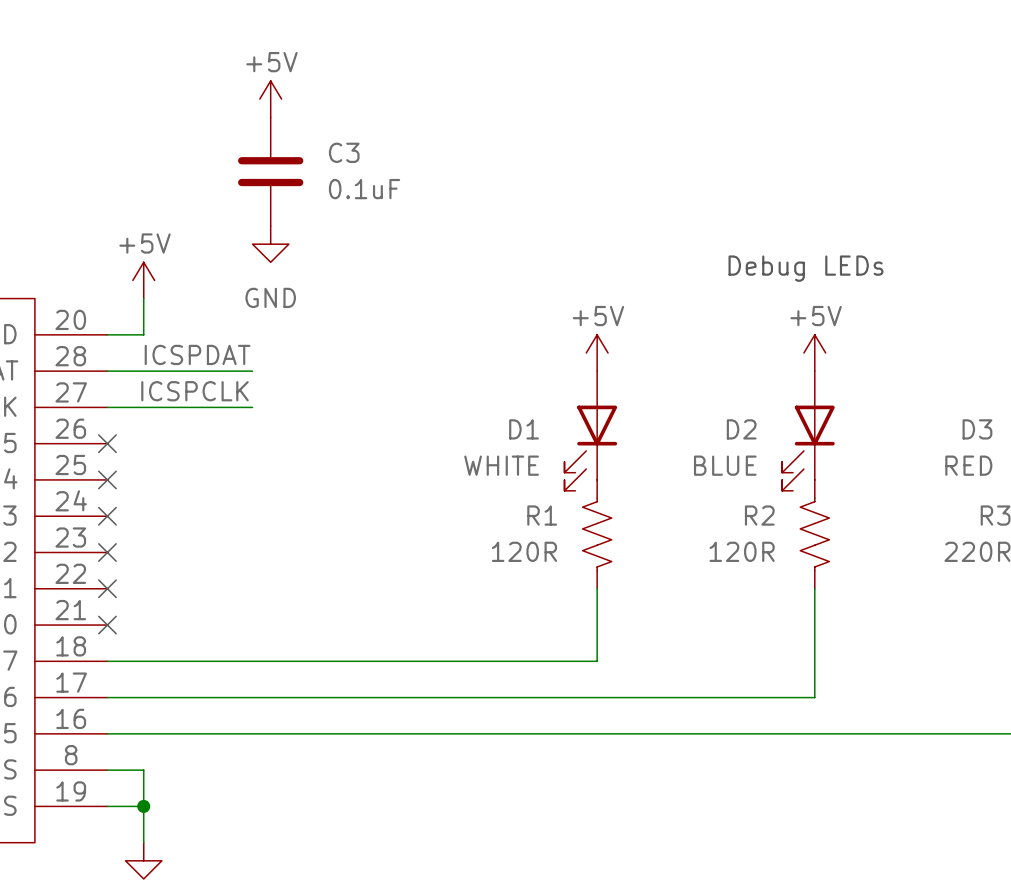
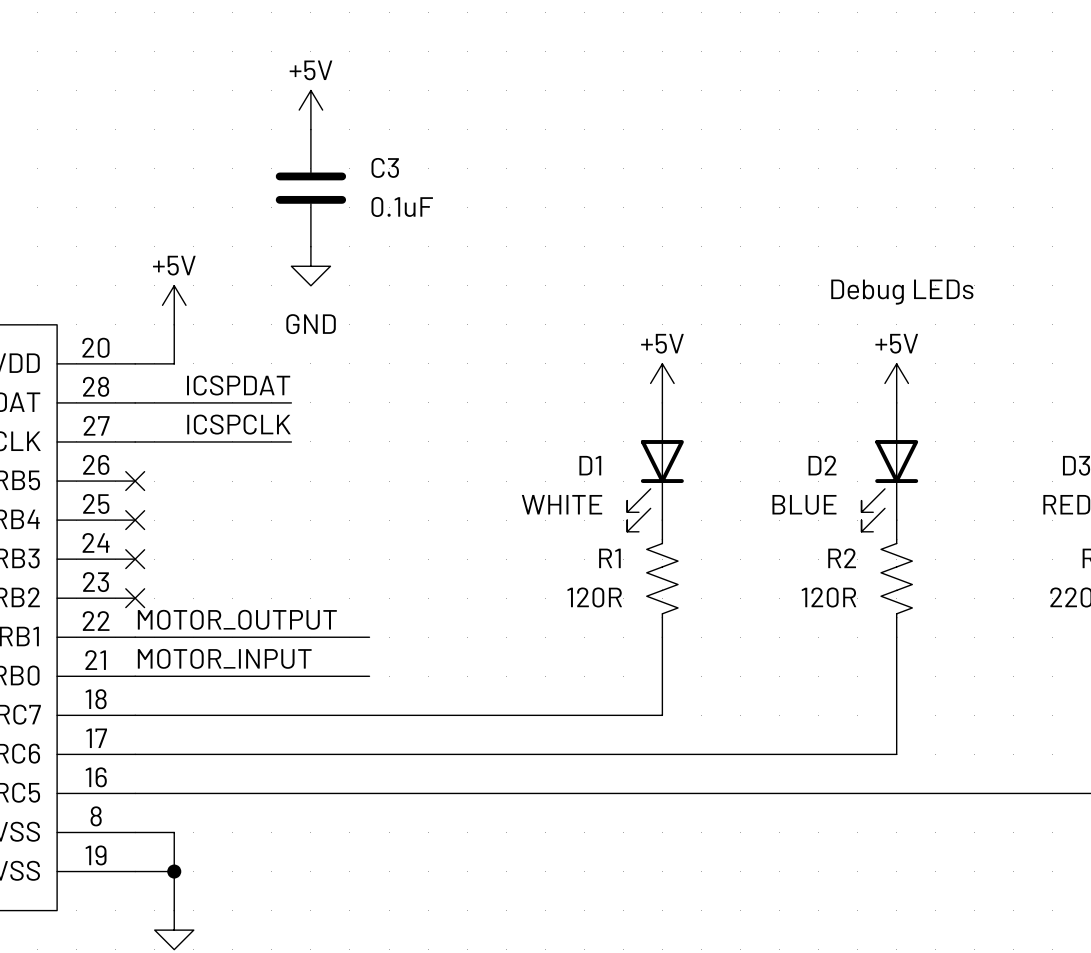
label: none -> MOTOR_OUTPUT (237, 619)
wire: none -> (135, 637) (369, 637)
no-connect mark: (107, 588) -> none
label: none -> MOTOR_INPUT (224, 658)
wire: none -> (135, 676) (369, 676)
no-connect mark: (107, 625) -> none

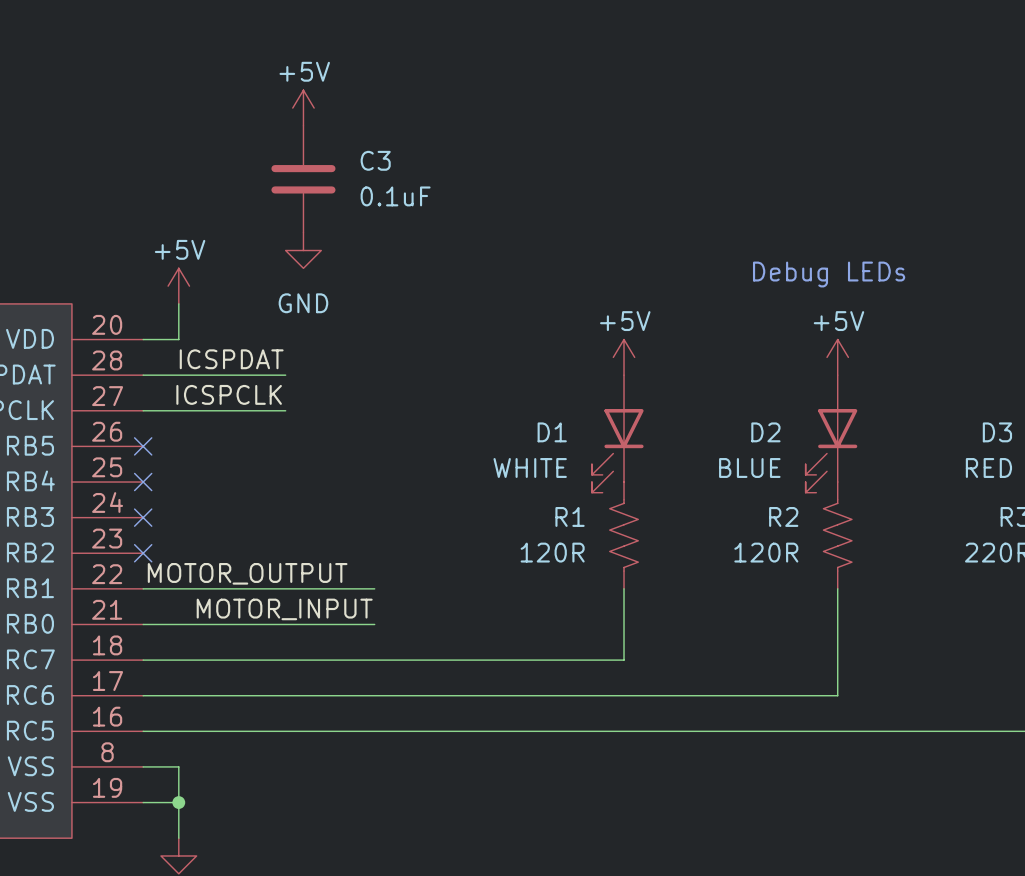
wire: none -> (356, 588) (374, 588)
label position: MOTOR_INPUT (224, 658) -> MOTOR_INPUT (284, 609)
wire: none -> (356, 624) (374, 624)

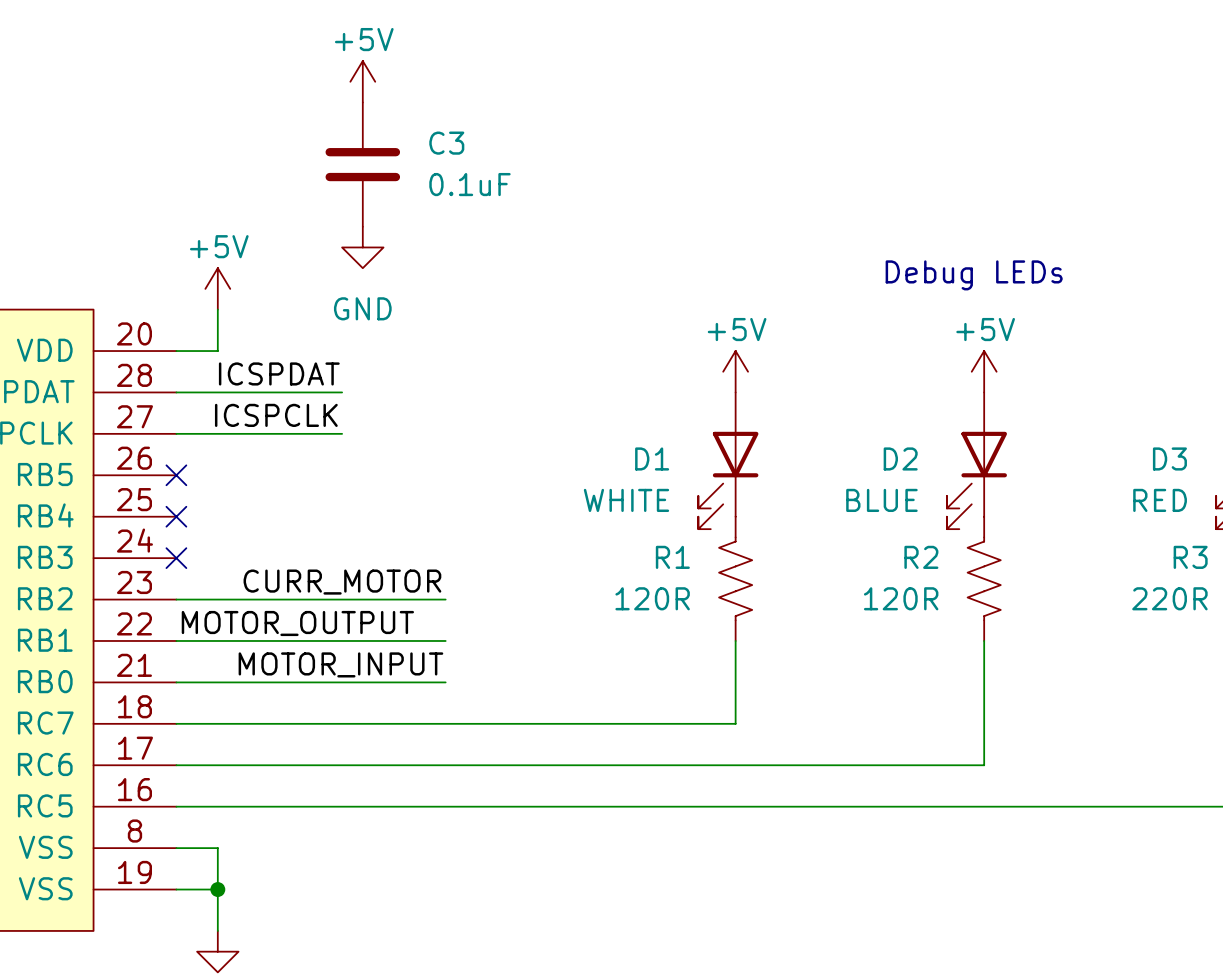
label: none -> CURR_MOTOR (342, 582)
wire: none -> (176, 599) (445, 599)
no-connect mark: (143, 553) -> none

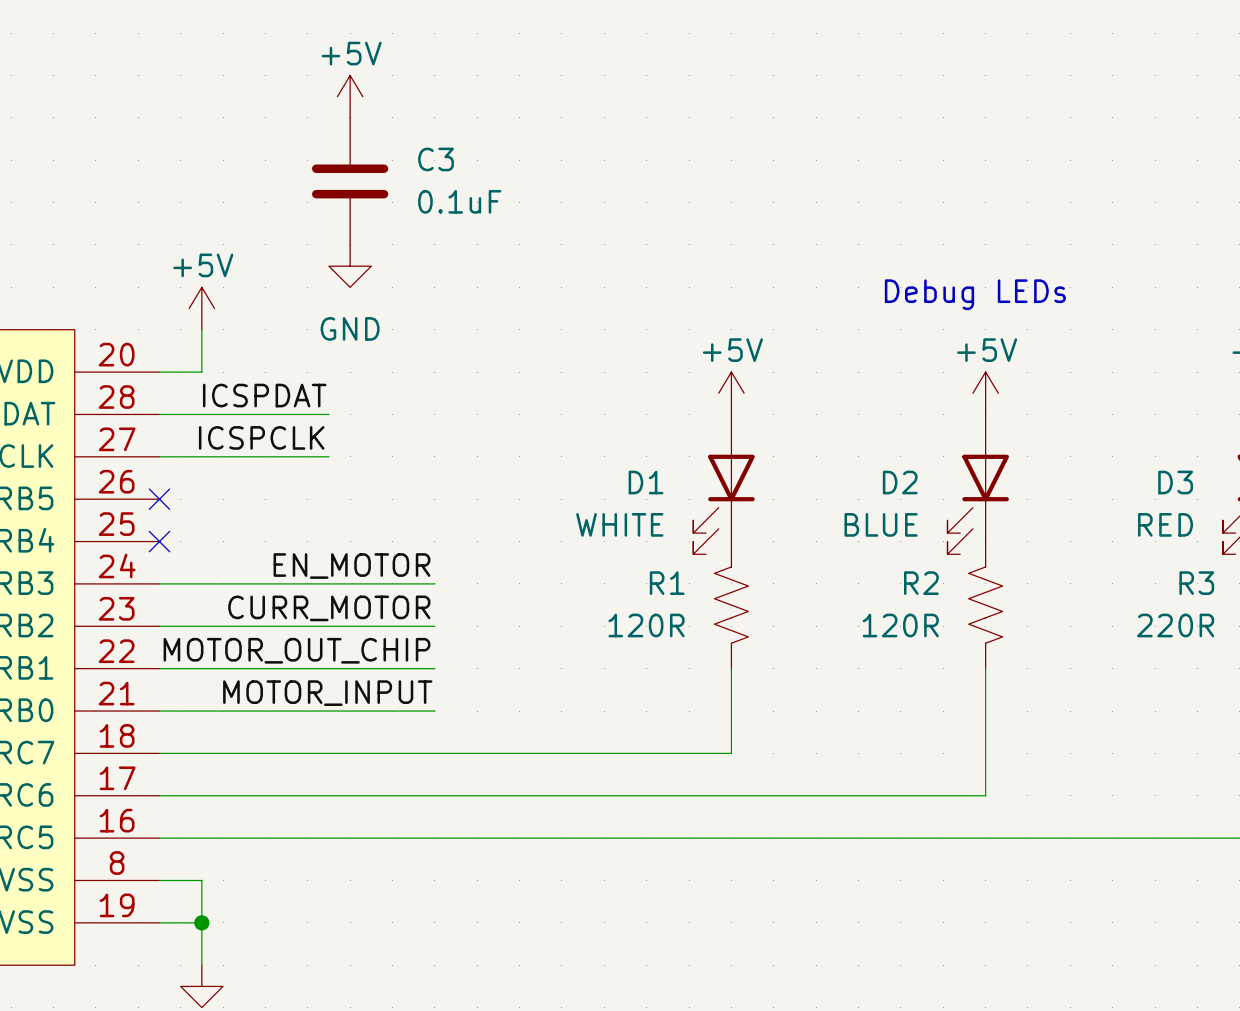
label: none -> EN_MOTOR (351, 566)
wire: none -> (159, 583) (434, 583)
no-connect mark: (176, 558) -> none
label: MOTOR_OUTPUT (297, 623) -> MOTOR_OUT_CHIP (297, 650)

